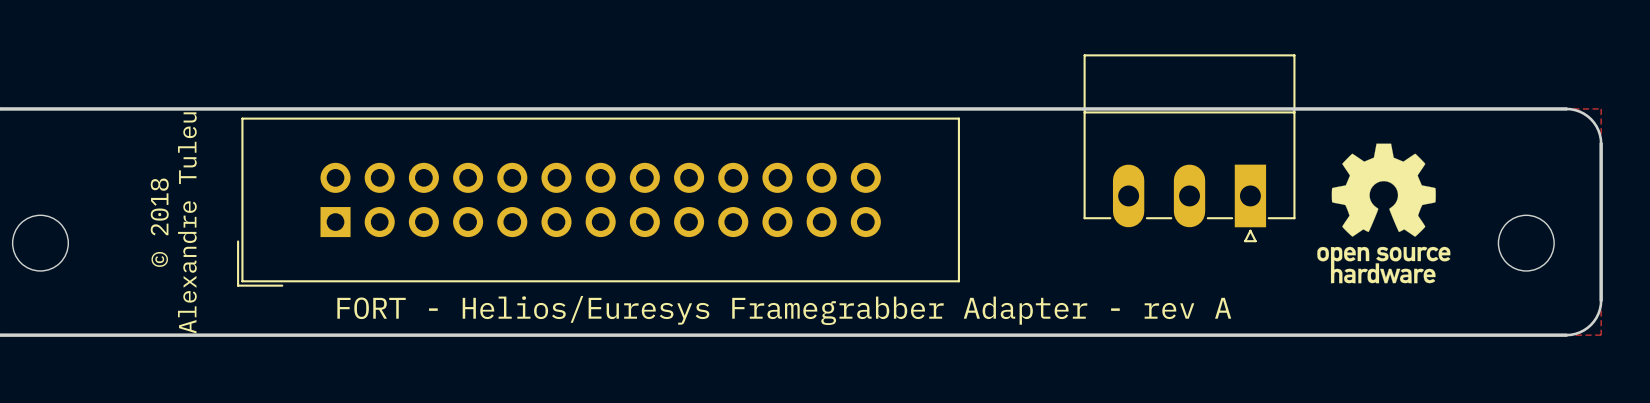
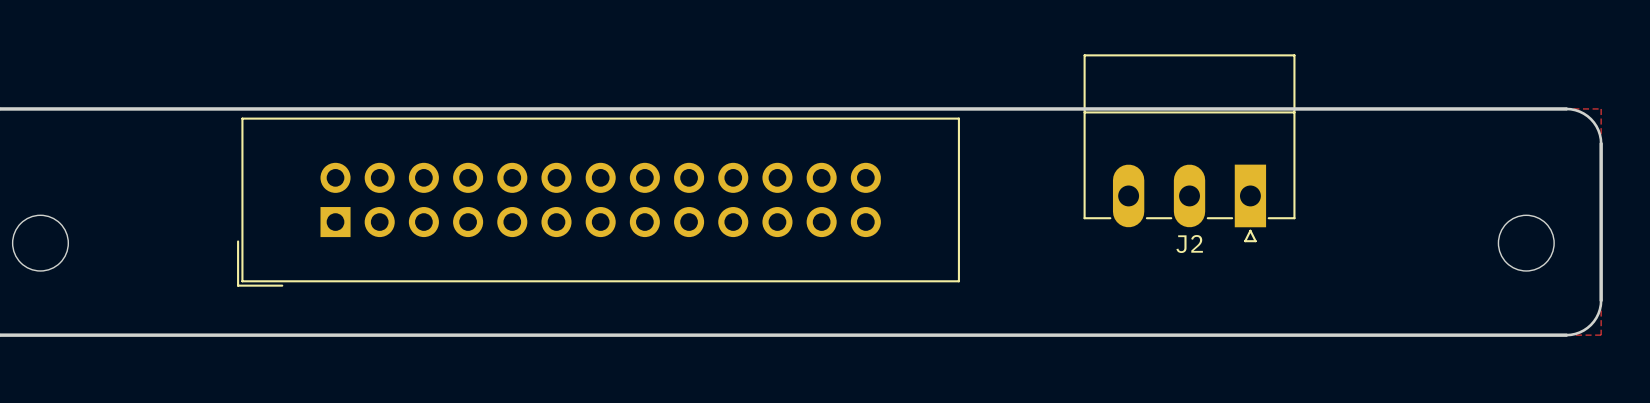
drawing: [1317, 143, 1451, 284] -> none
text: © 2018 (159, 222) -> none
text: Alexandre Tuleu (187, 222) -> none
J2 name: none -> J2 (1189, 244)
text: FORT - Helios/Euresys Framegrabber Adapter - rev A (784, 310) -> none

